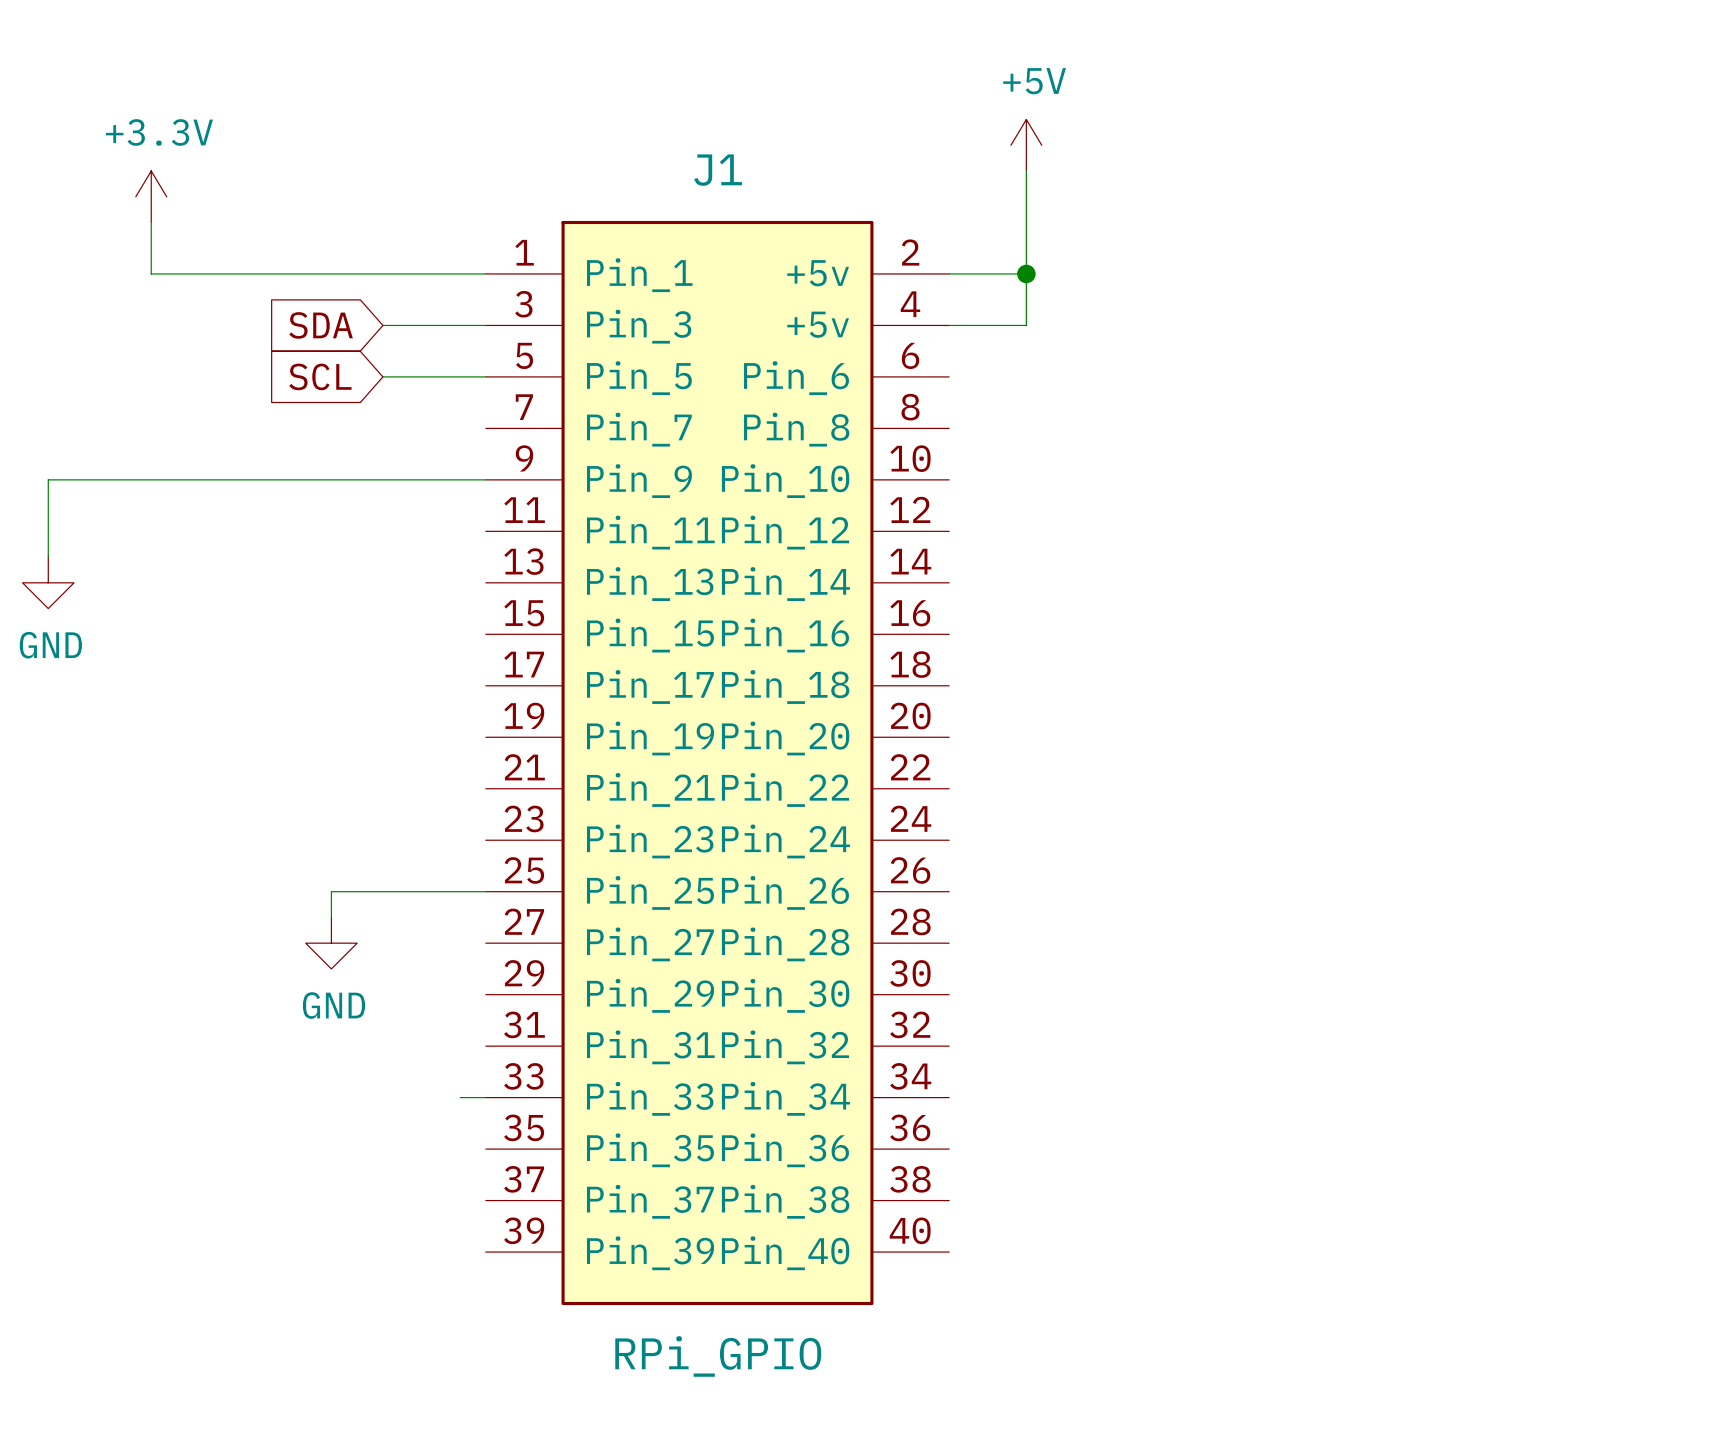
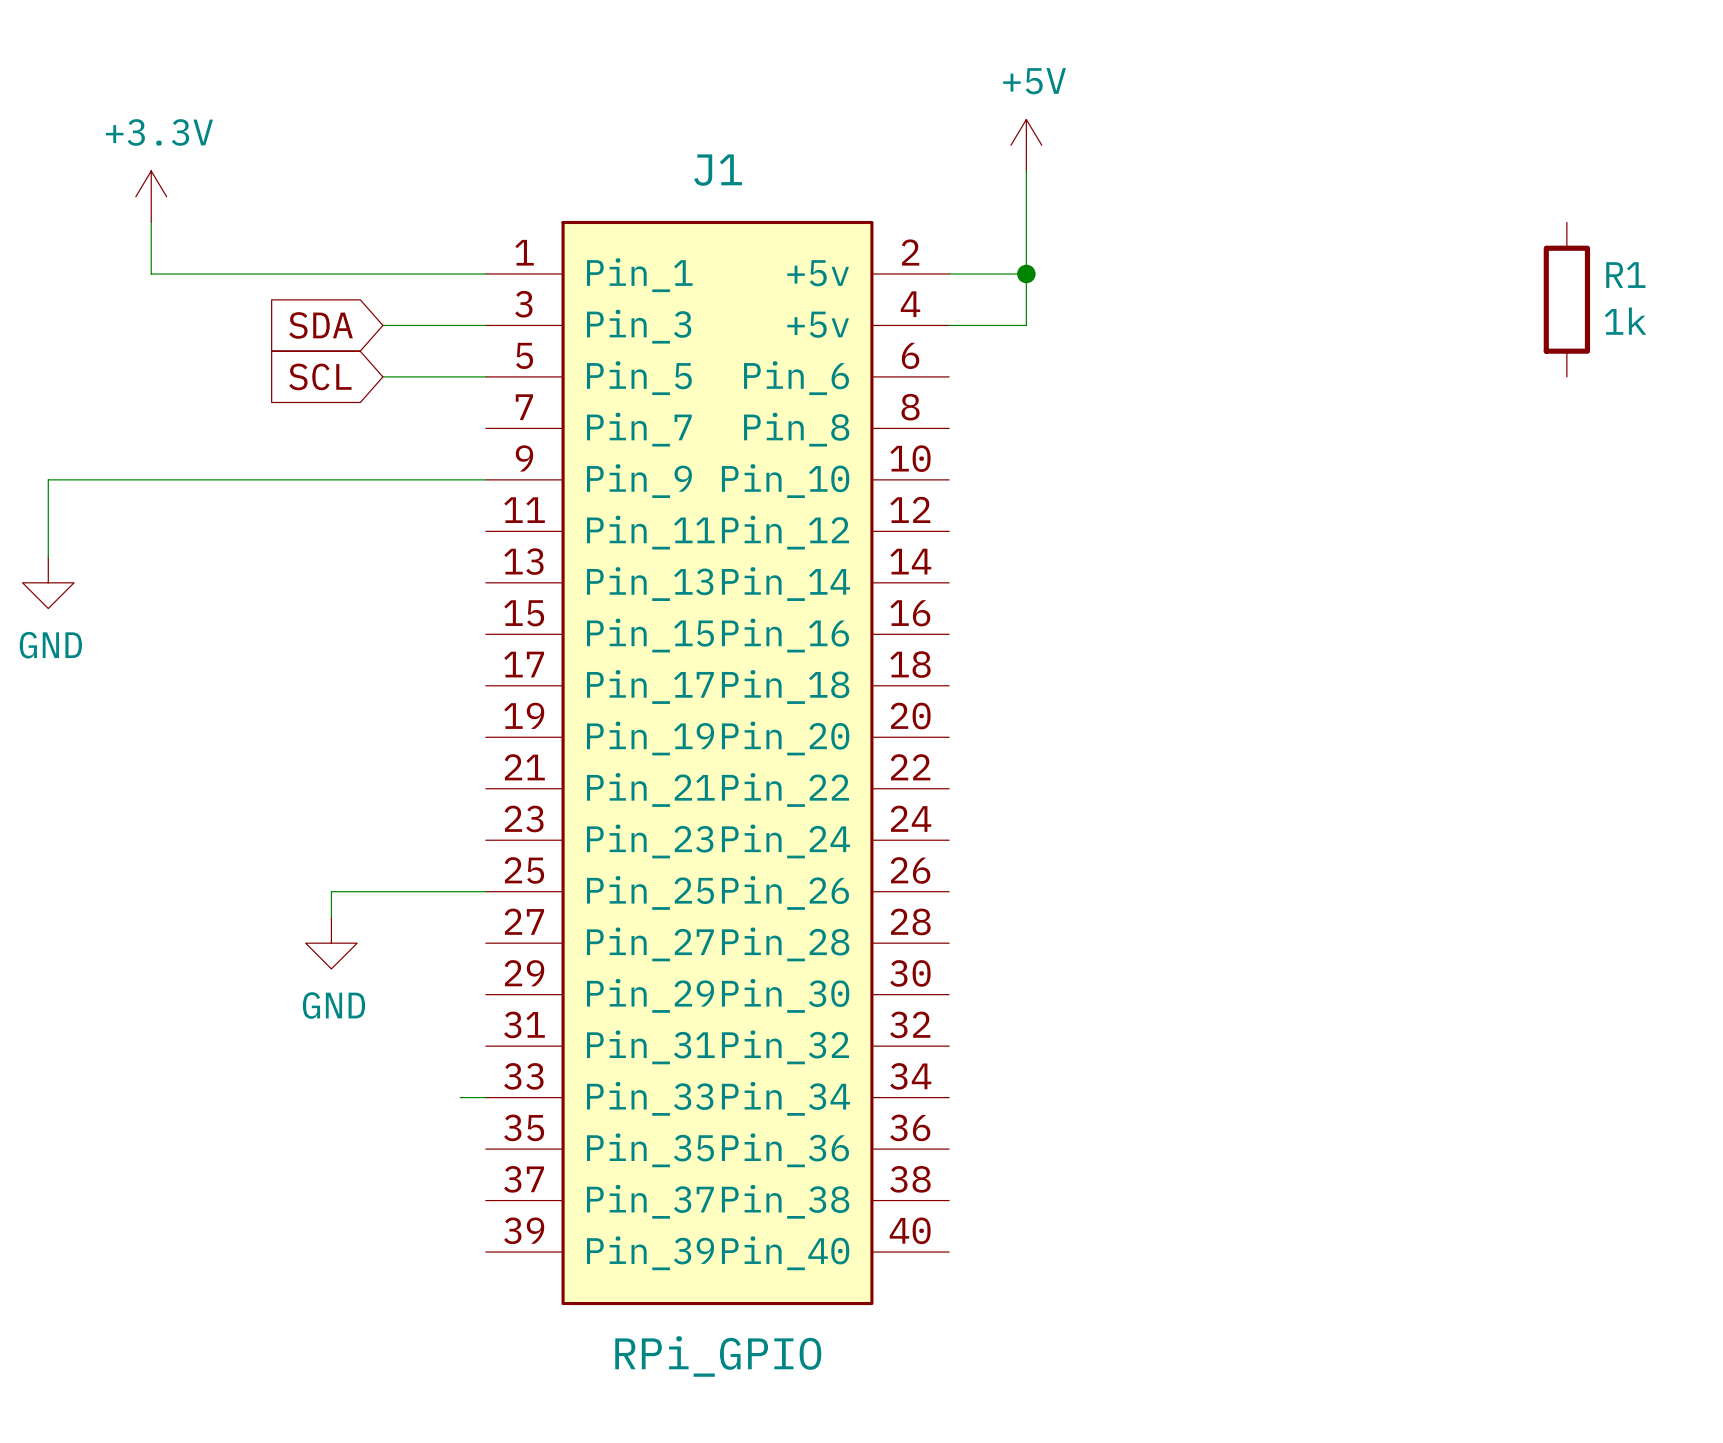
R1: none -> 1k (1566, 299)

